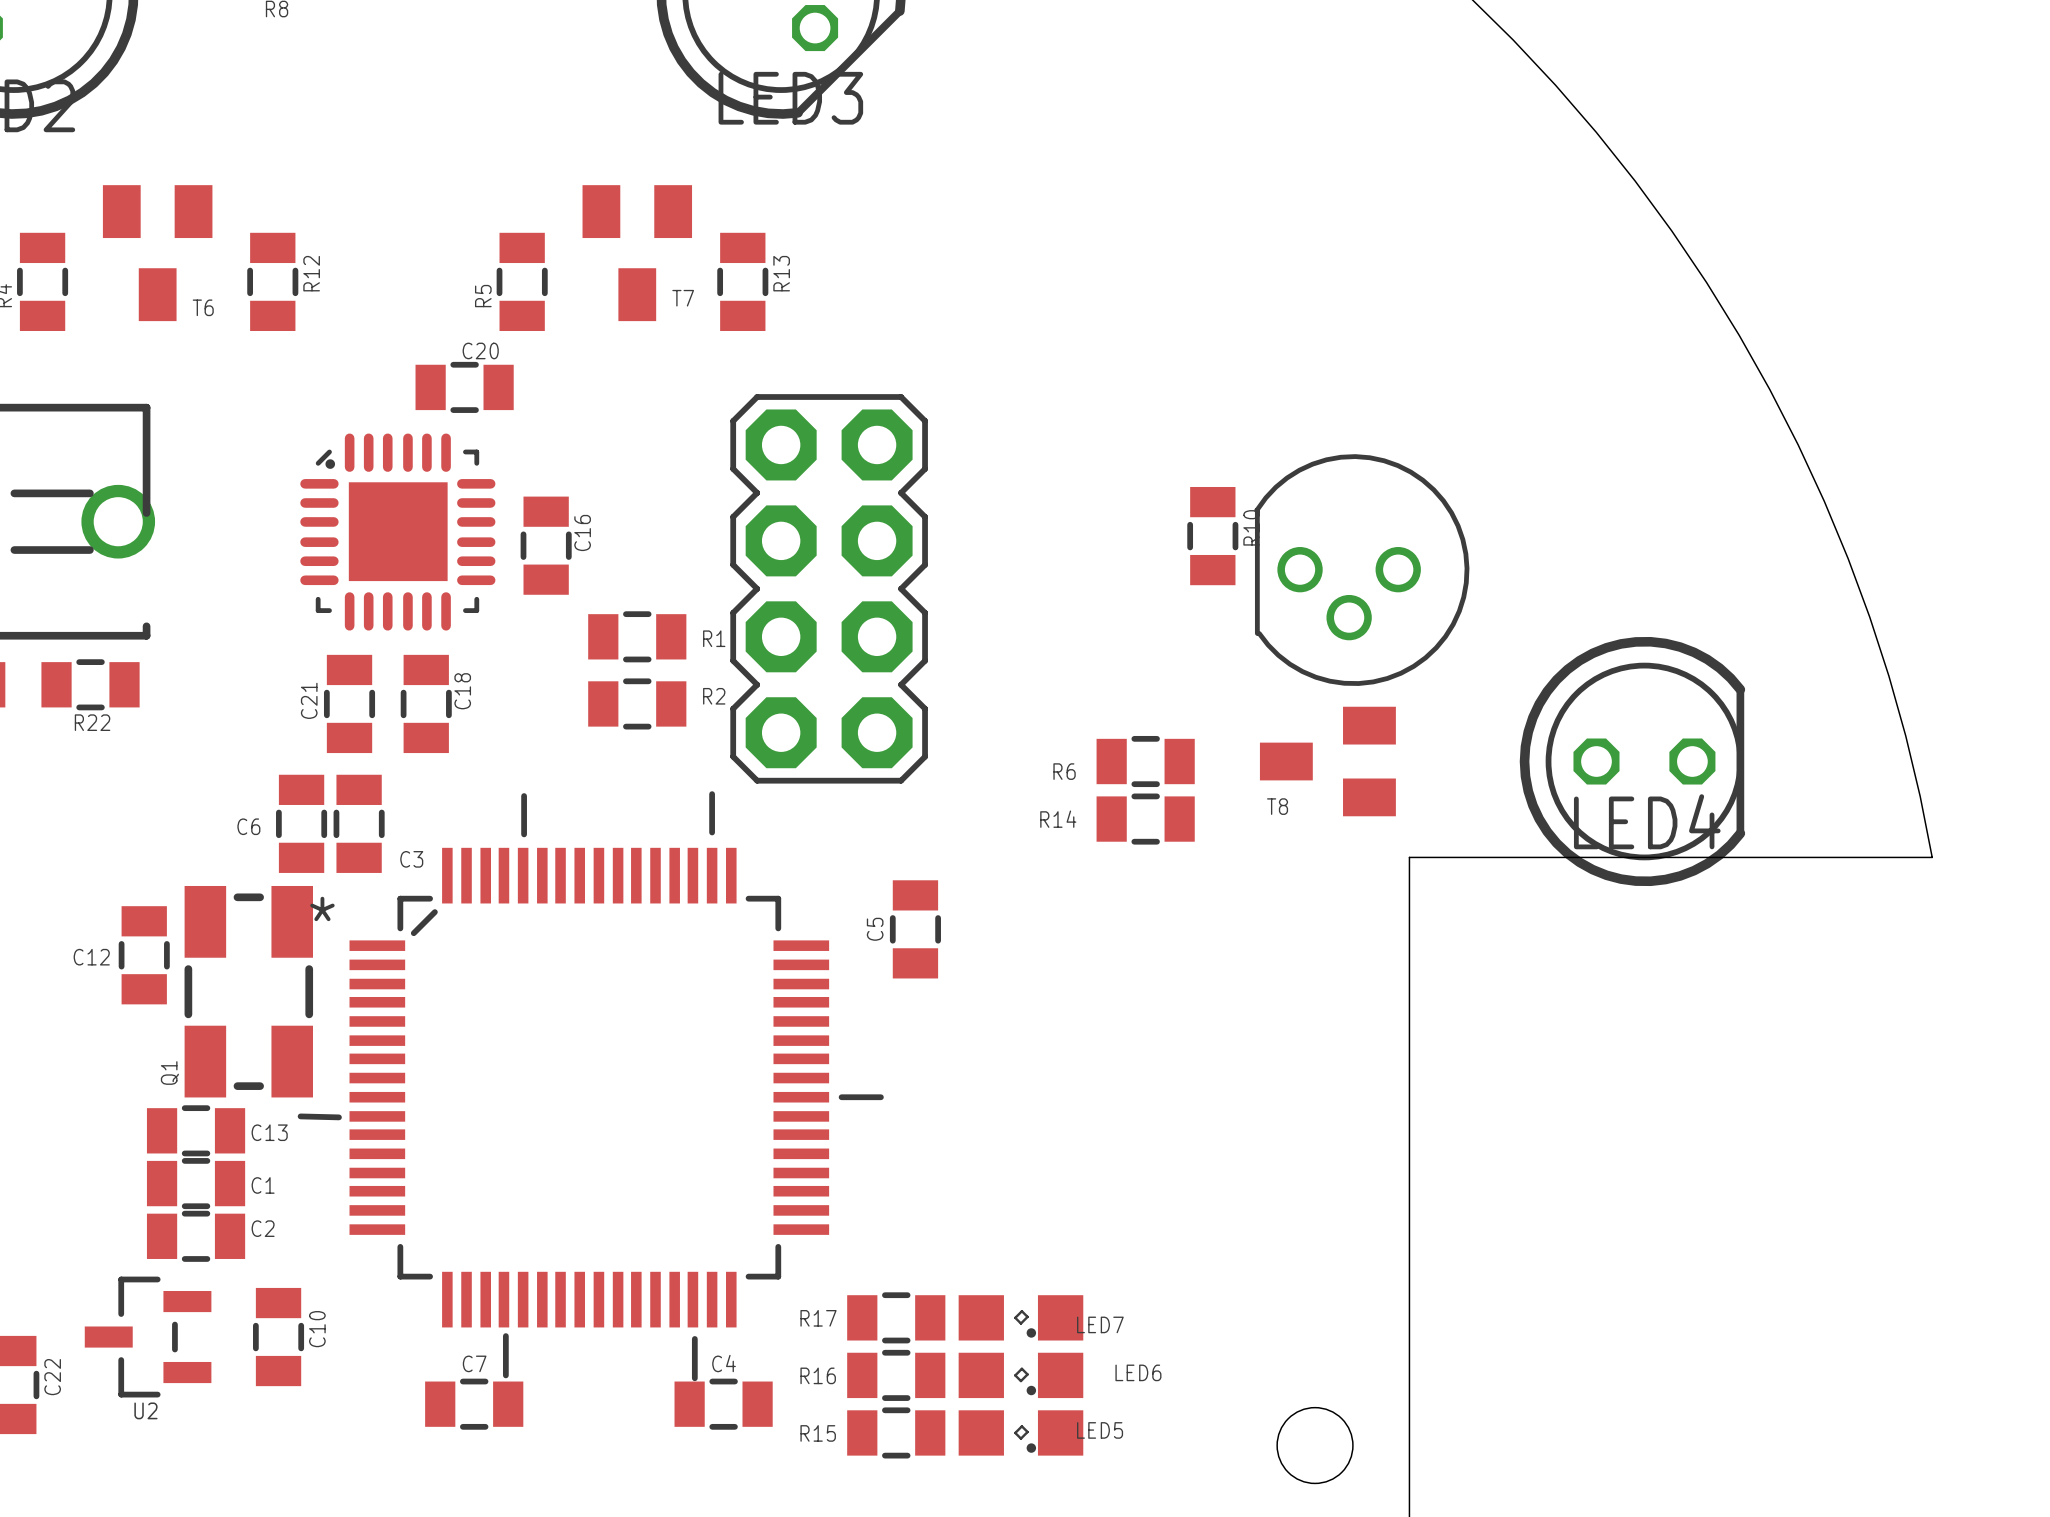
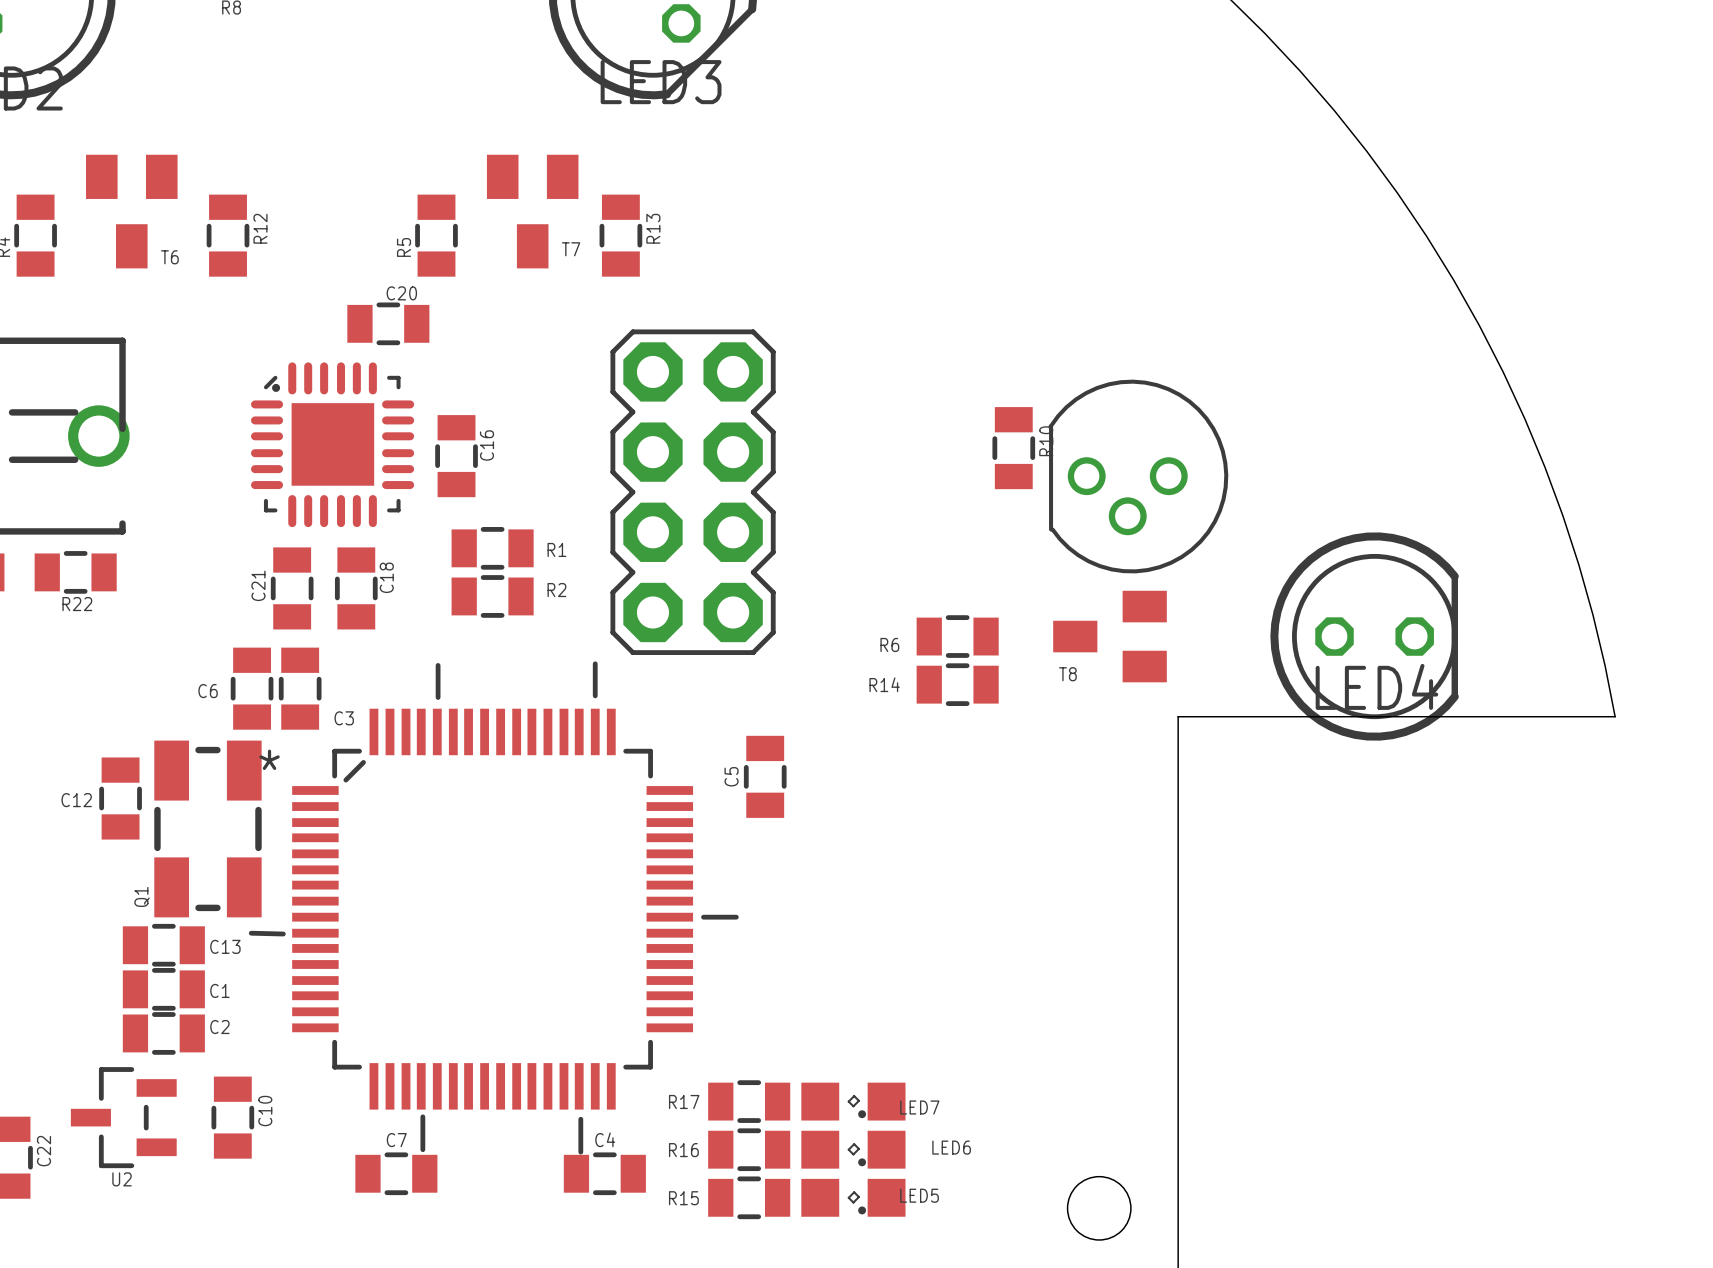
R1 position: (637, 636) -> (492, 548)
R2 position: (637, 703) -> (492, 596)

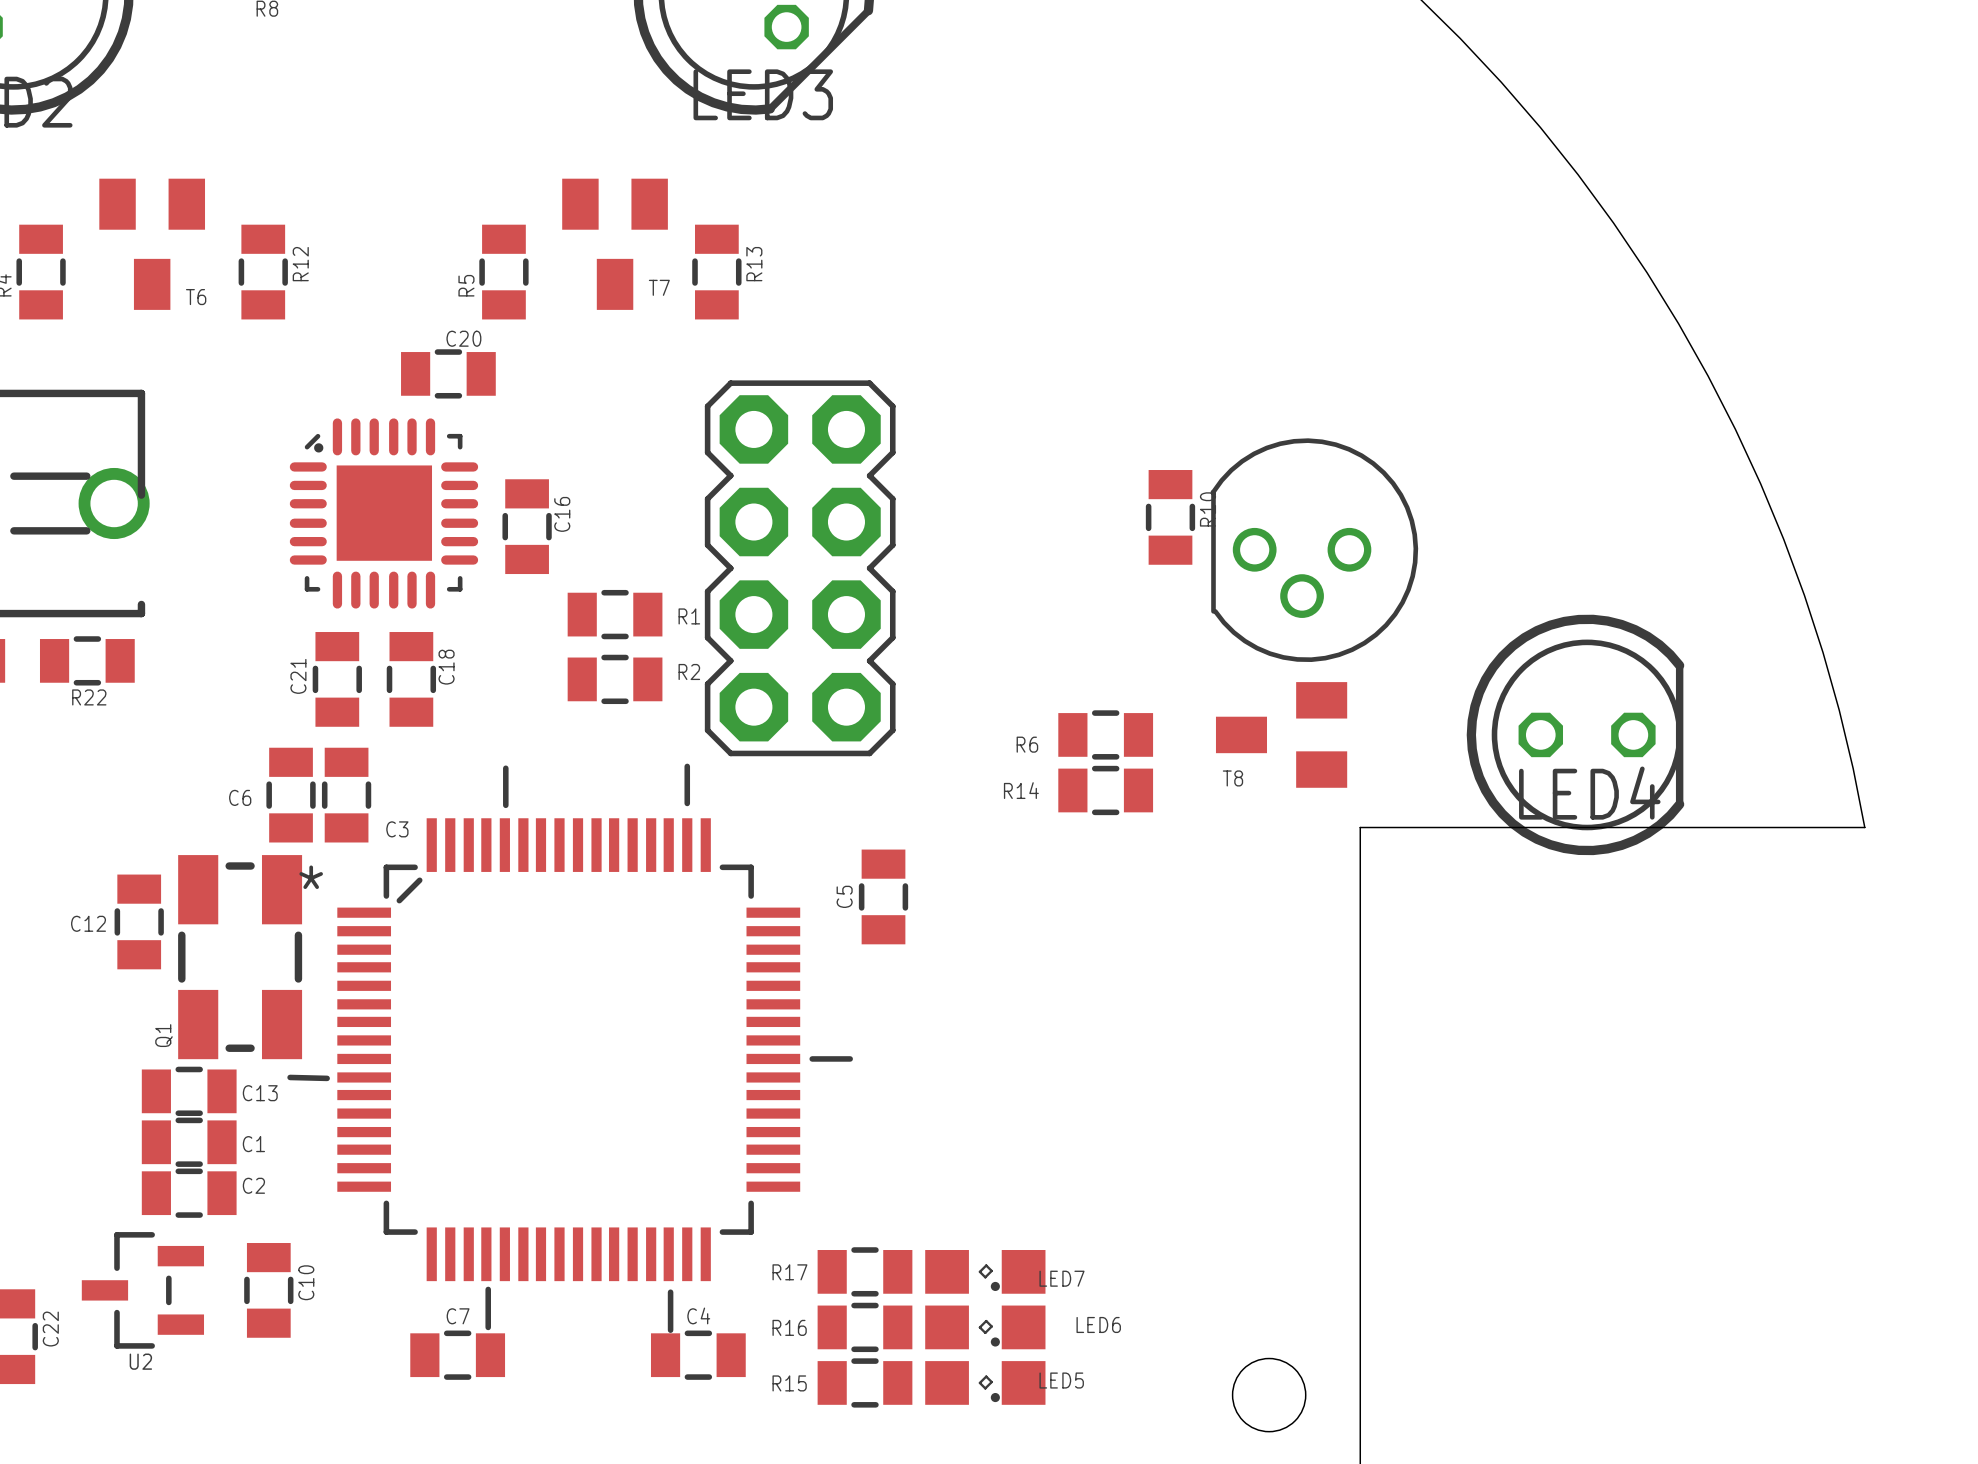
R1 position: (492, 548) -> (615, 614)
R2 position: (492, 596) -> (615, 679)

